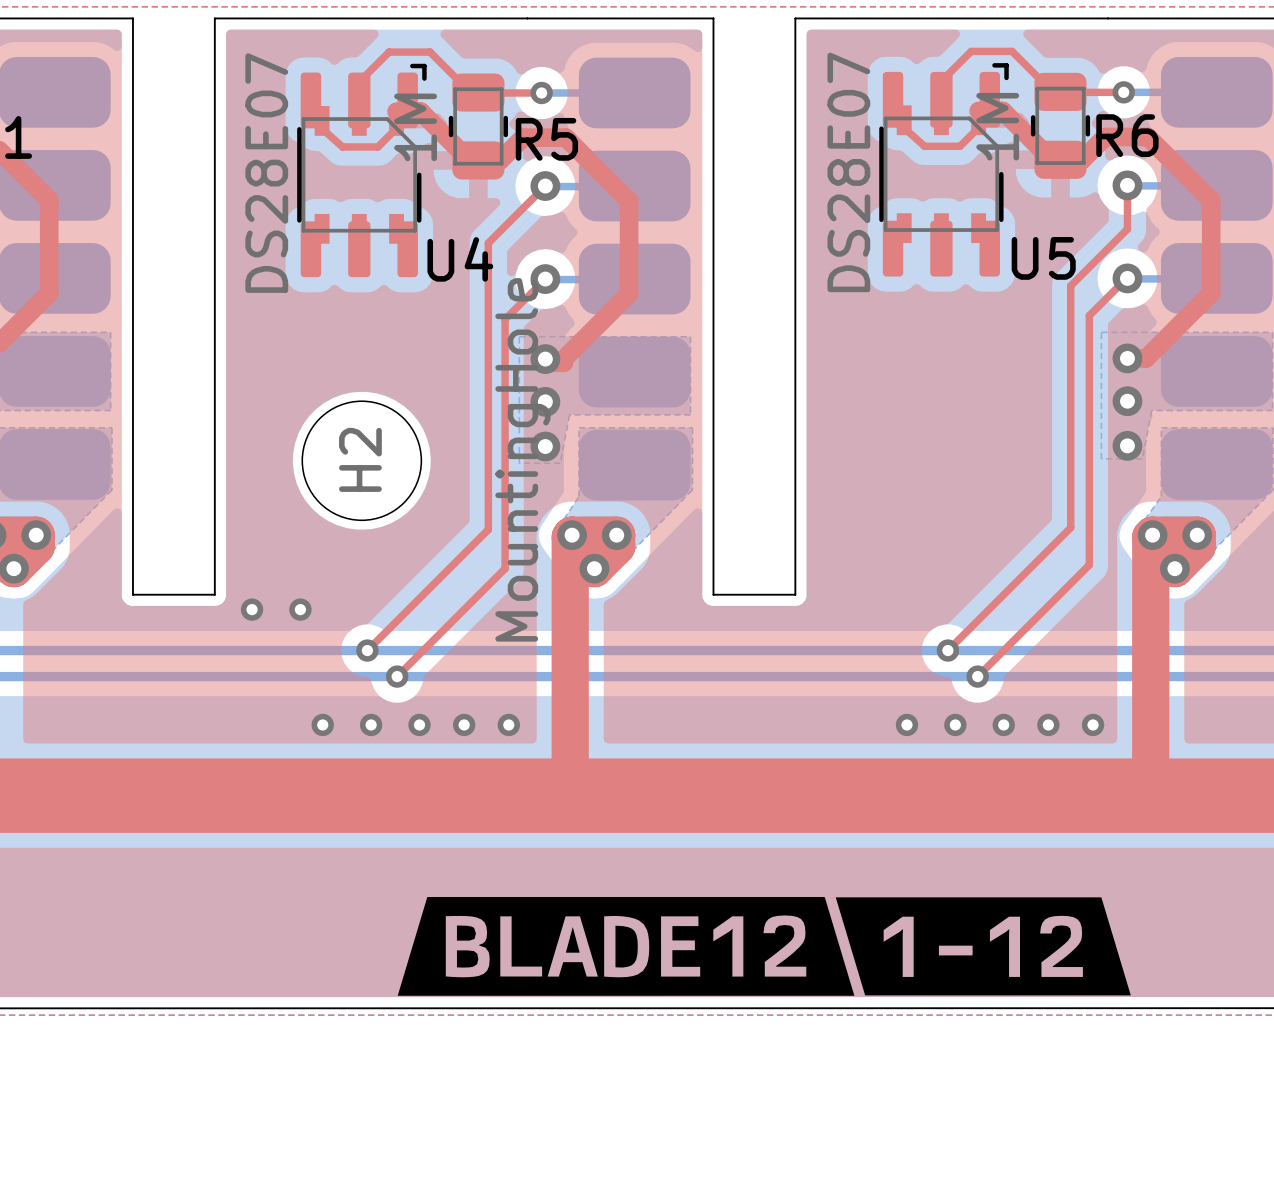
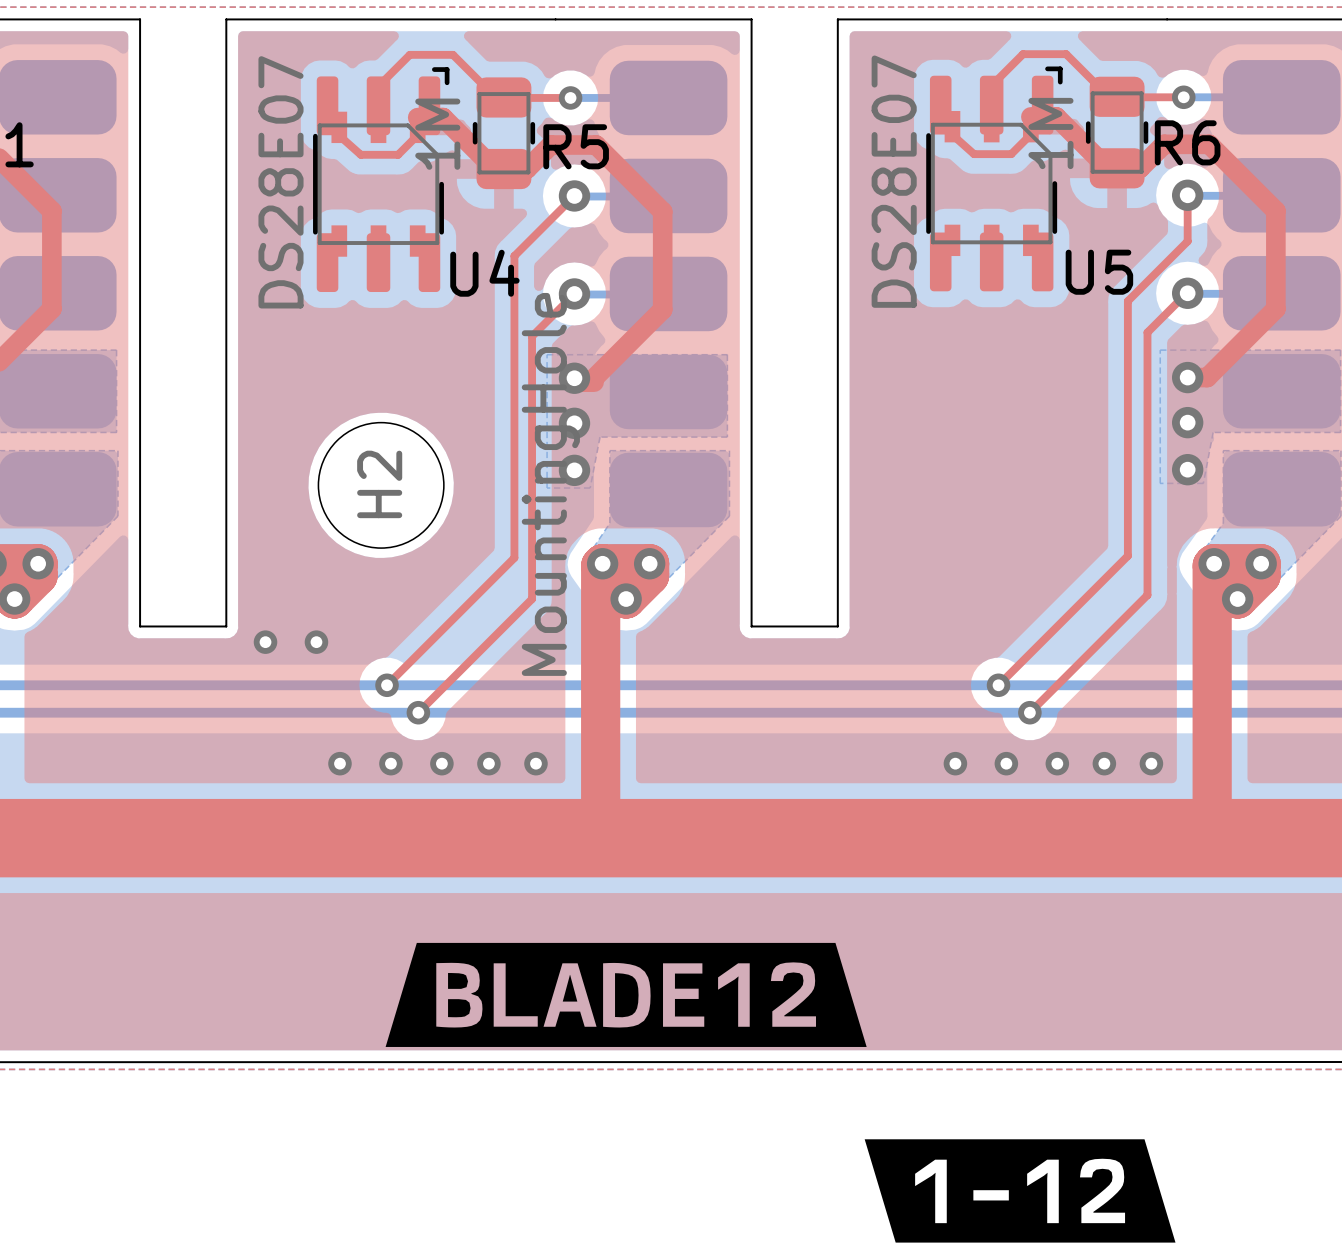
drawing position: (626, 946) -> (626, 994)
drawing position: (983, 946) -> (1020, 1190)

